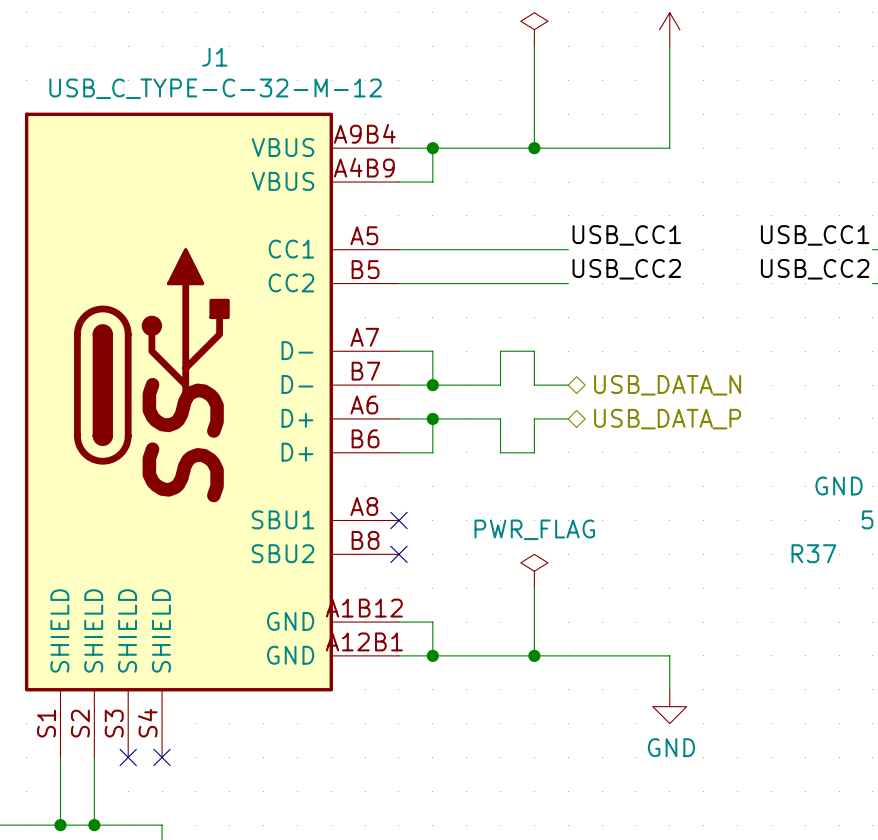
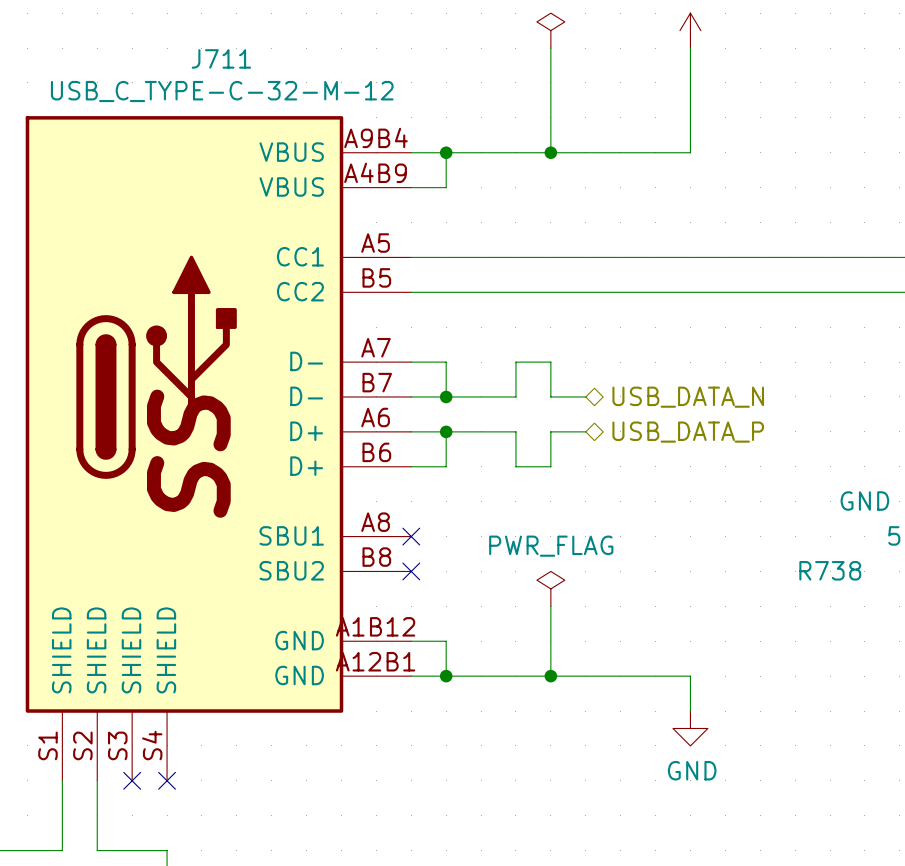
label: USB_CC1 (626, 235) -> none
label: USB_CC1 (815, 235) -> none
wire: none -> (585, 257) (899, 257)
label: USB_CC2 (626, 269) -> none
label: USB_CC2 (815, 269) -> none
wire: none -> (585, 292) (899, 292)
J1: USB_C_TYPE-C-32-M-12 (211, 435) -> none
J711: none -> USB_C_TYPE-C-32-M-12 (218, 448)
R37 name: R37 (813, 553) -> R738 (830, 570)
wire: (60, 825) (94, 825) -> none
junction: (60, 825) -> none
junction: (94, 825) -> none

